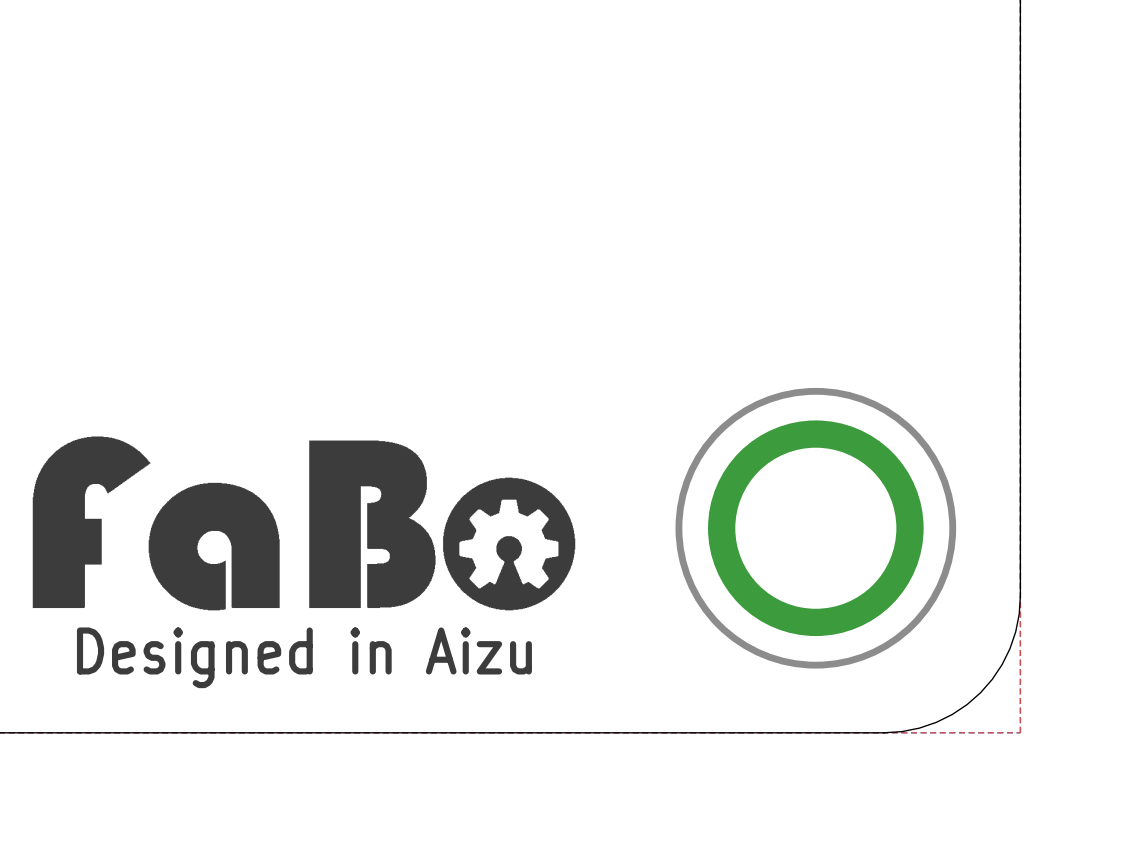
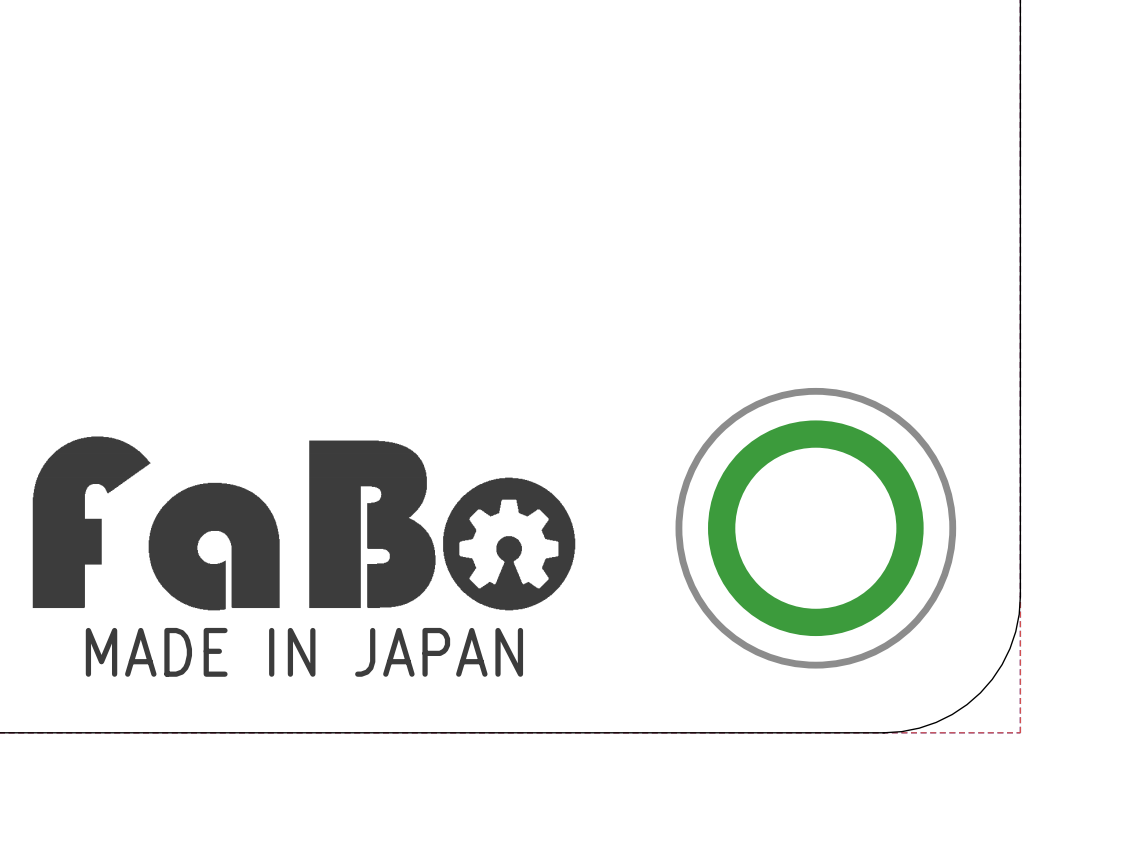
text: Designed in Aizu (304, 657) -> MADE IN JAPAN (304, 652)

